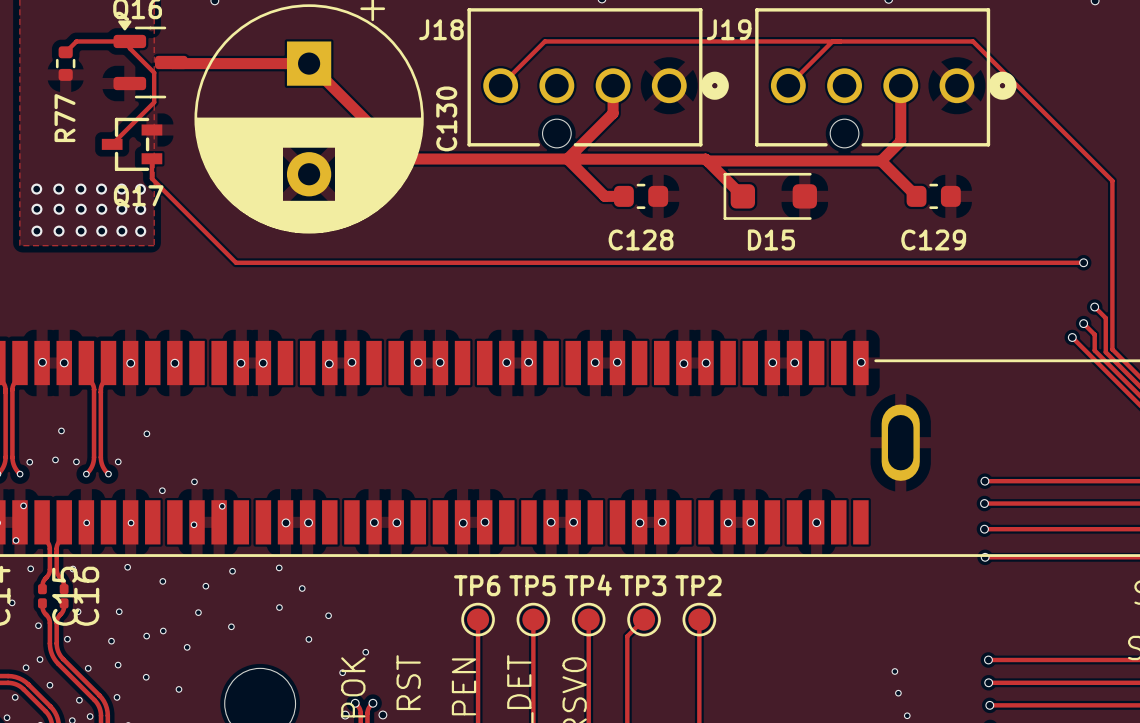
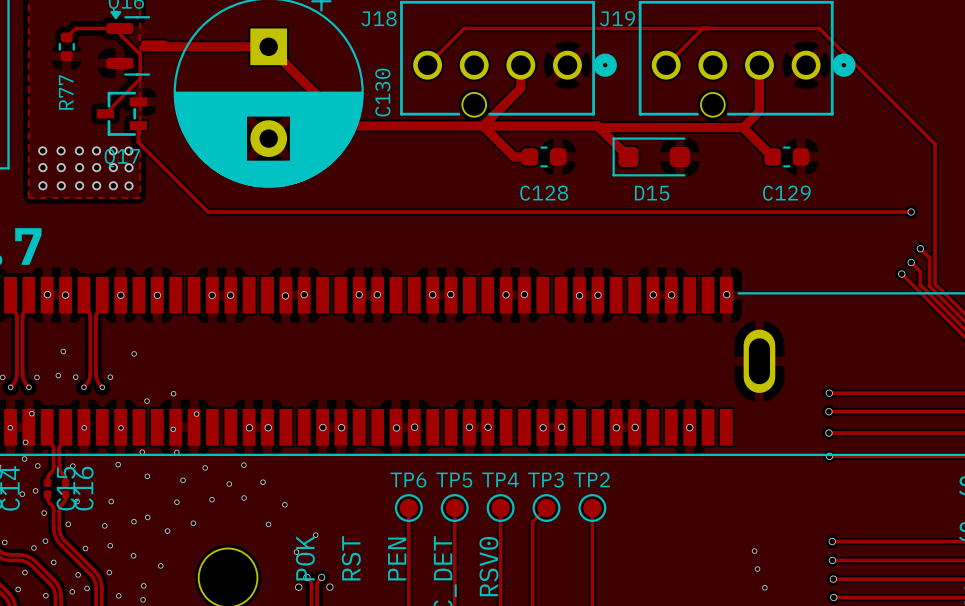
via: none -> (142, 452)
via: none -> (176, 452)
via: none -> (24, 459)
via: none -> (229, 484)
via: none -> (35, 490)
via: none -> (211, 499)
via: (231, 626) -> none
via: none -> (193, 523)
via: none -> (143, 585)

